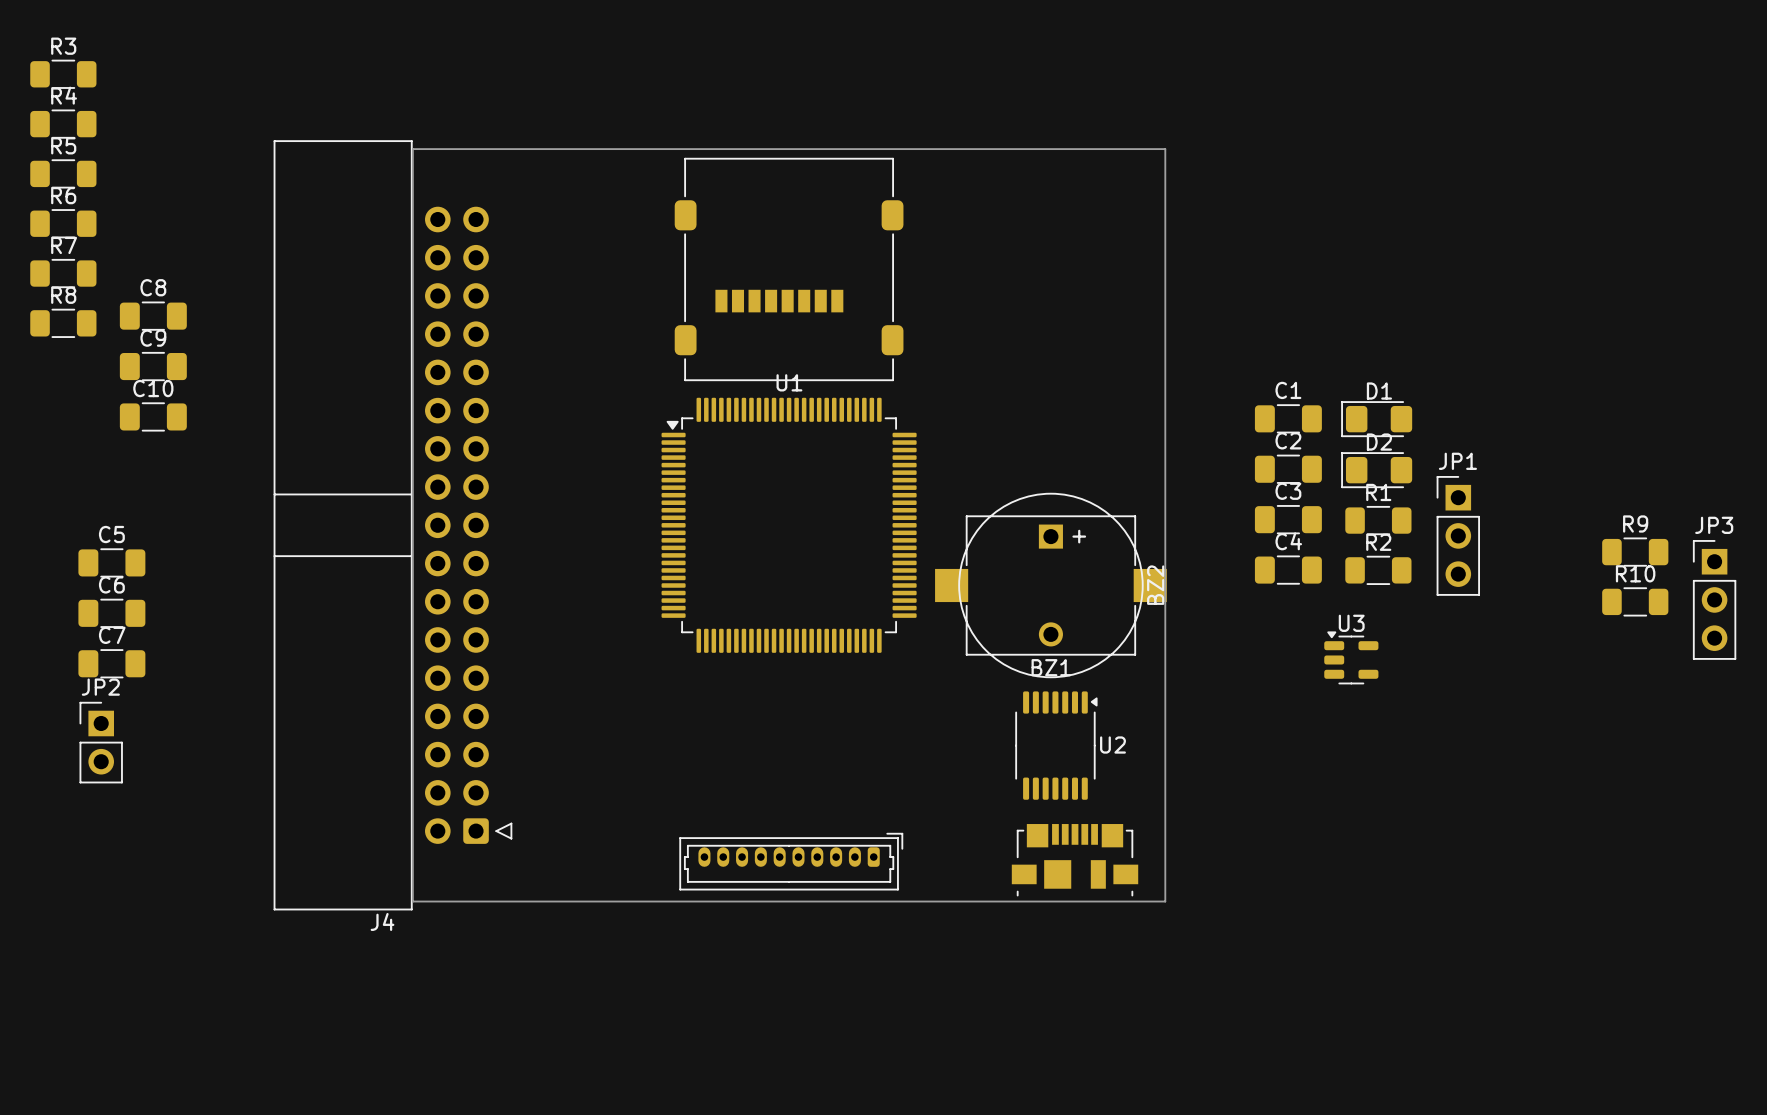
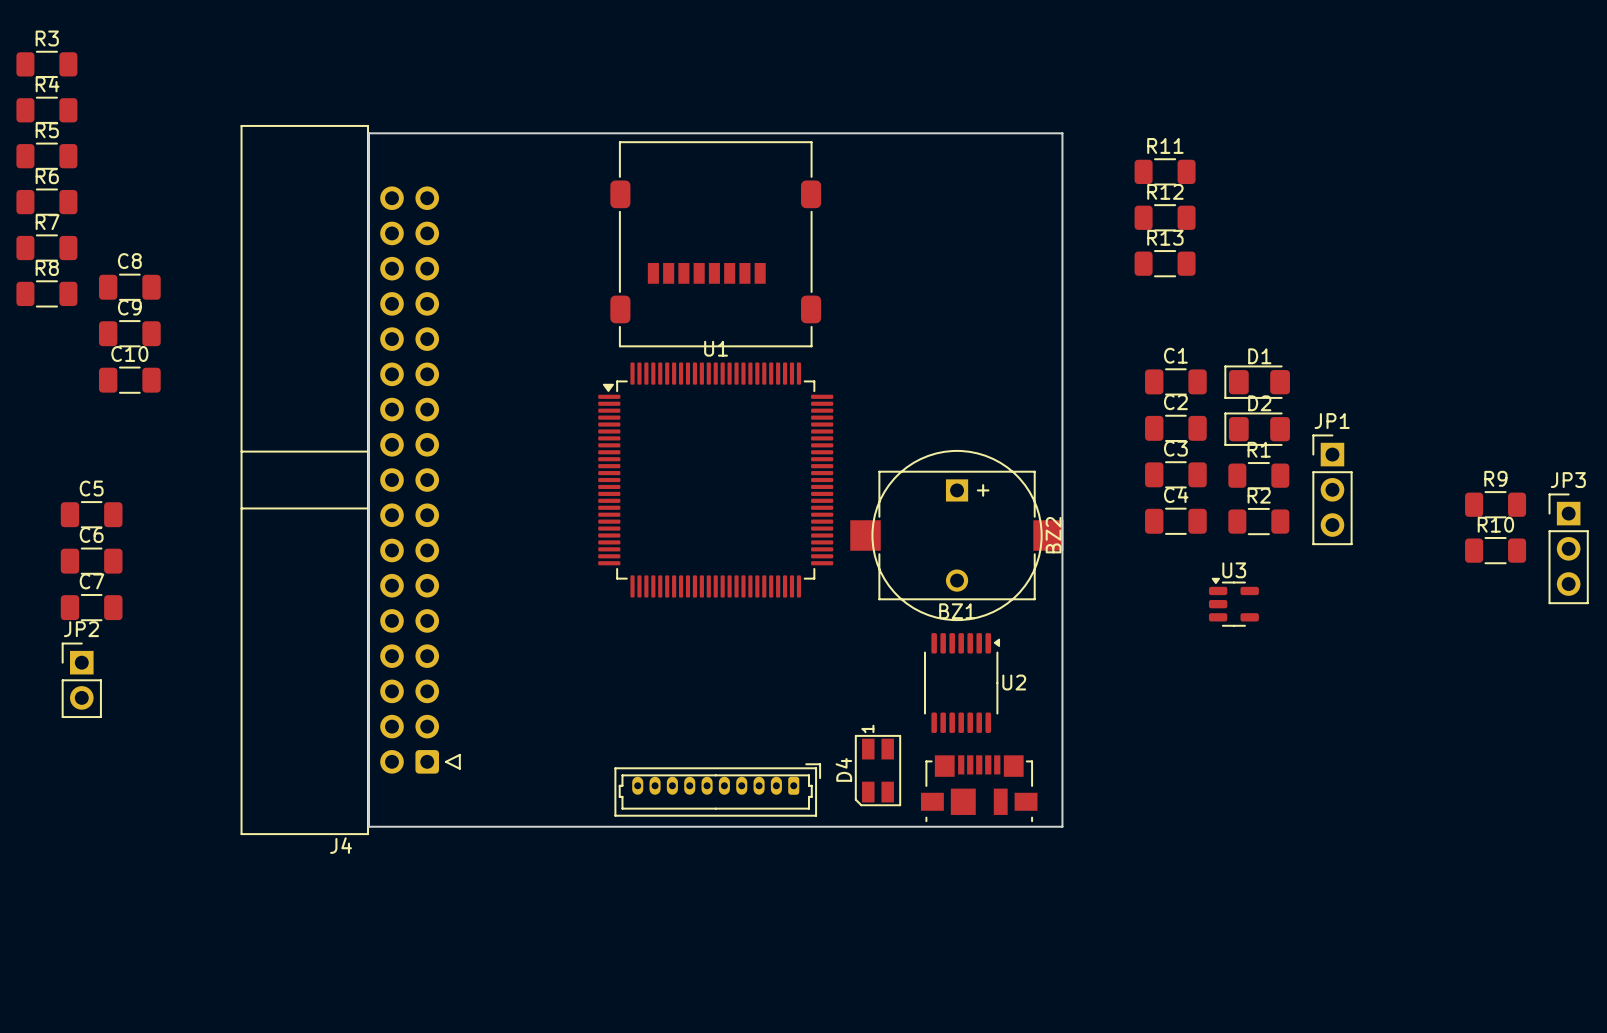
R11: none -> (1165, 171)
R12: none -> (1165, 217)
R13: none -> (1165, 263)
D4: none -> (878, 770)

